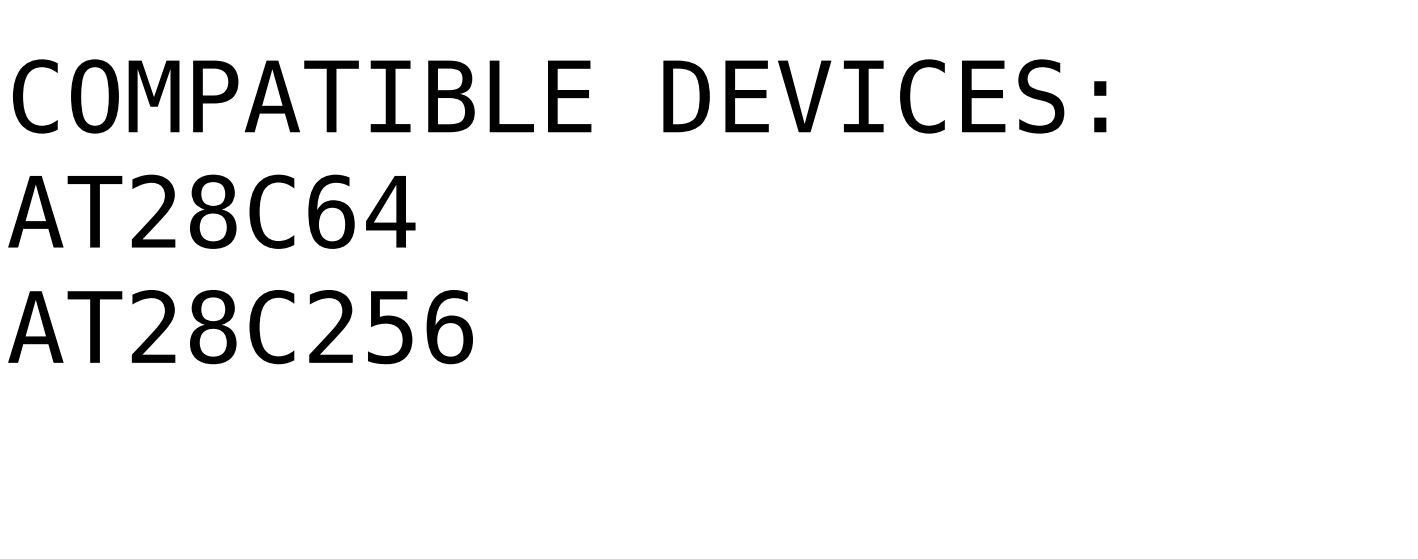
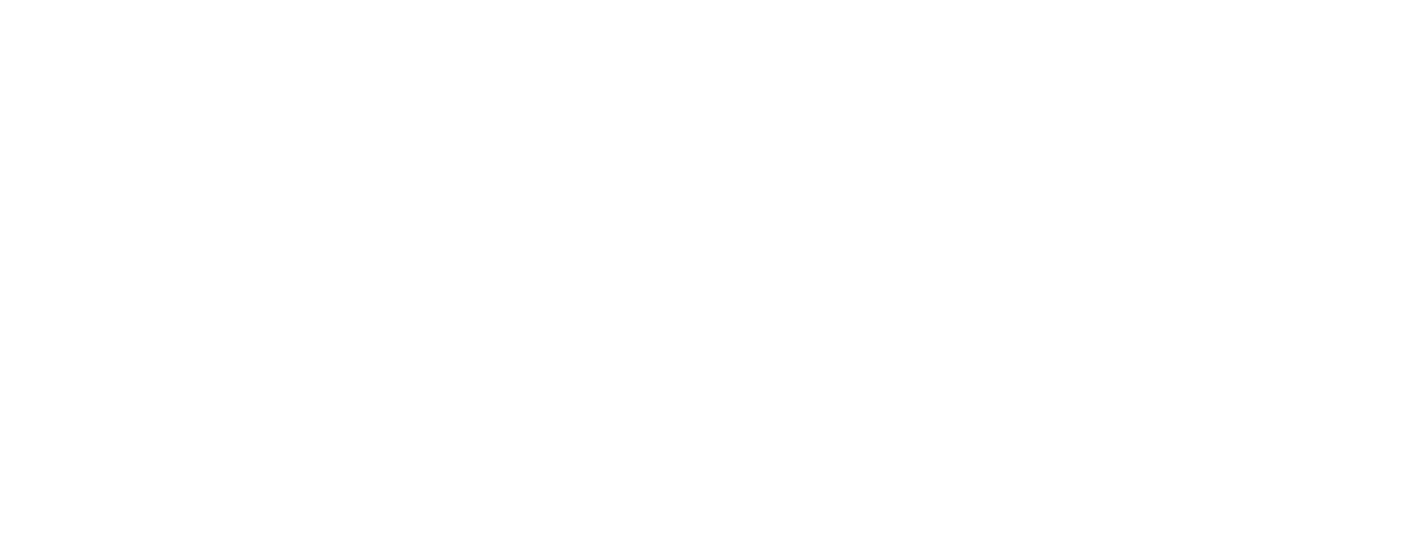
text: COMPATIBLE DEVICES: (559, 96) -> none
text: AT28C64 (211, 211) -> none
text: AT28C256 (240, 327) -> none

